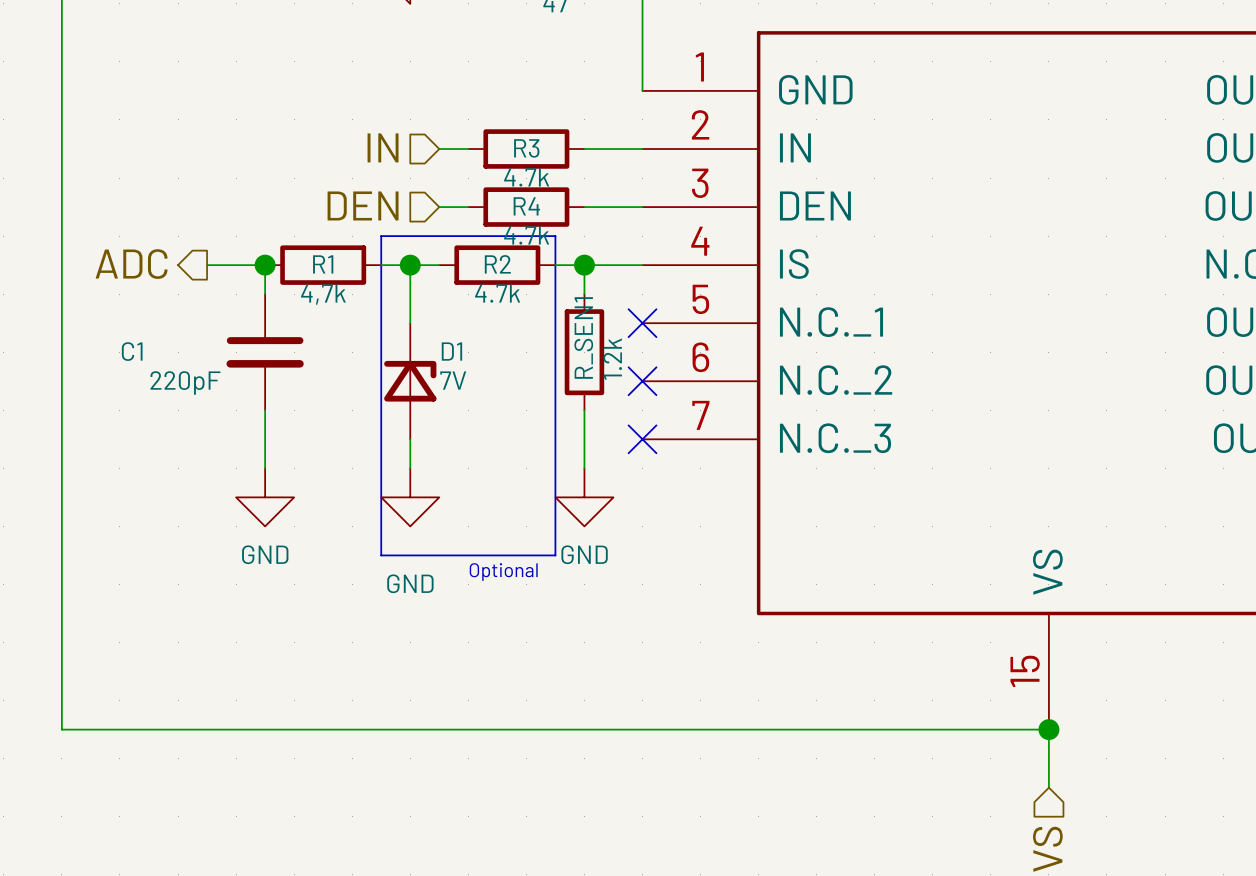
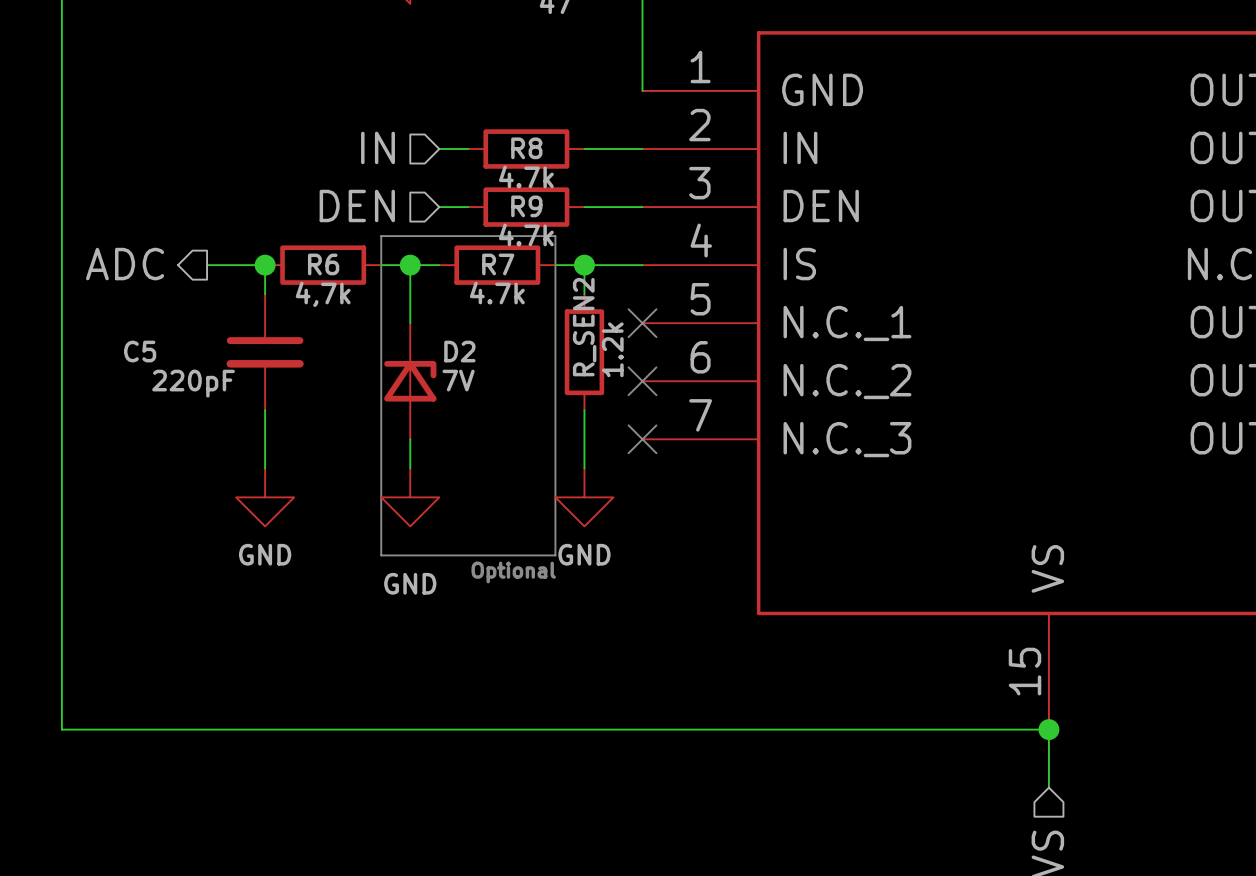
R3 name: R3 (526, 148) -> R8 (526, 148)
R4 name: R4 (526, 206) -> R9 (526, 206)
R1 name: R1 (323, 264) -> R6 (323, 264)
R2 name: R2 (497, 264) -> R7 (498, 264)
R_SEN1 name: R_SEN1 (583, 337) -> R_SEN2 (584, 327)
C1 name: C1 (132, 351) -> C5 (140, 351)
D1 name: D1 (451, 351) -> D2 (459, 351)

